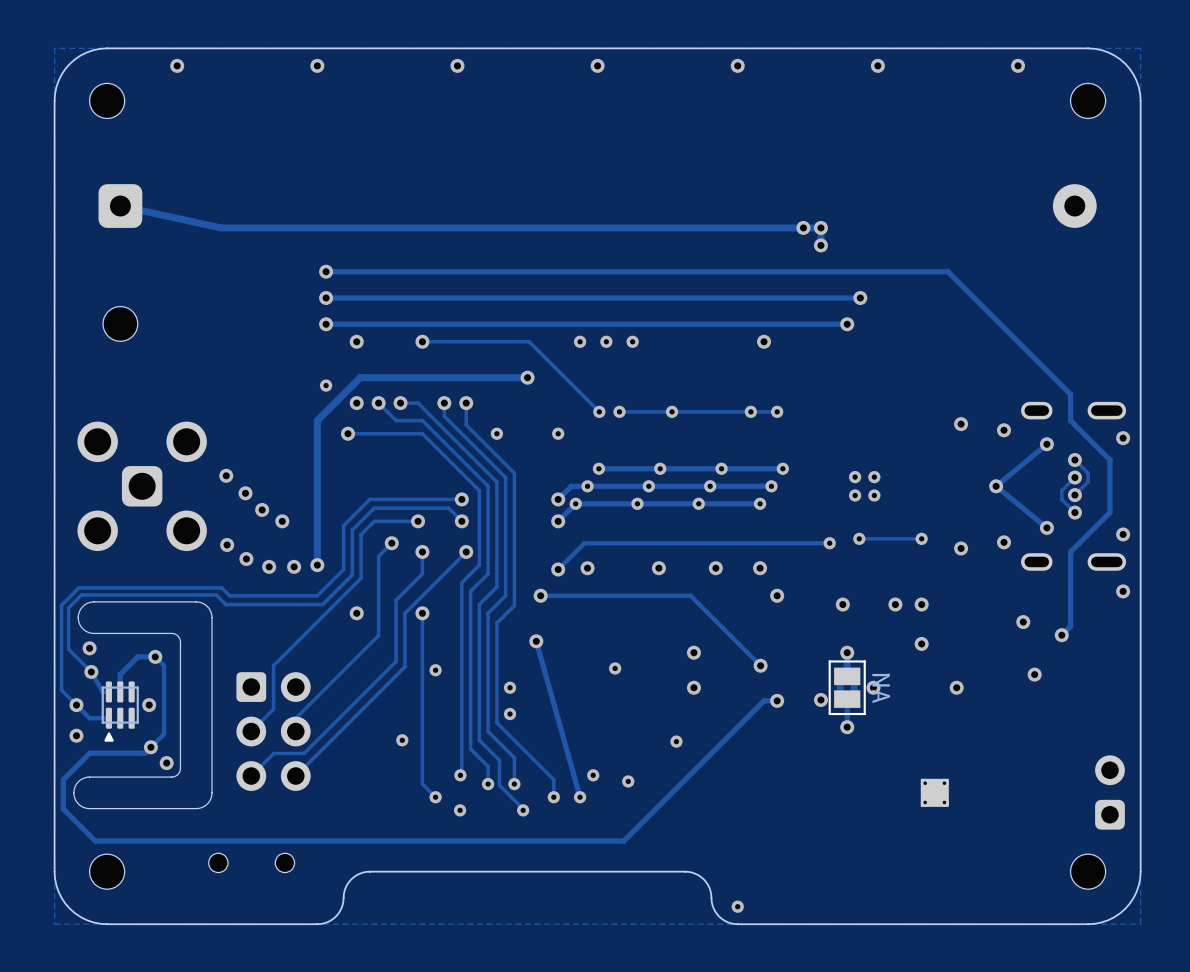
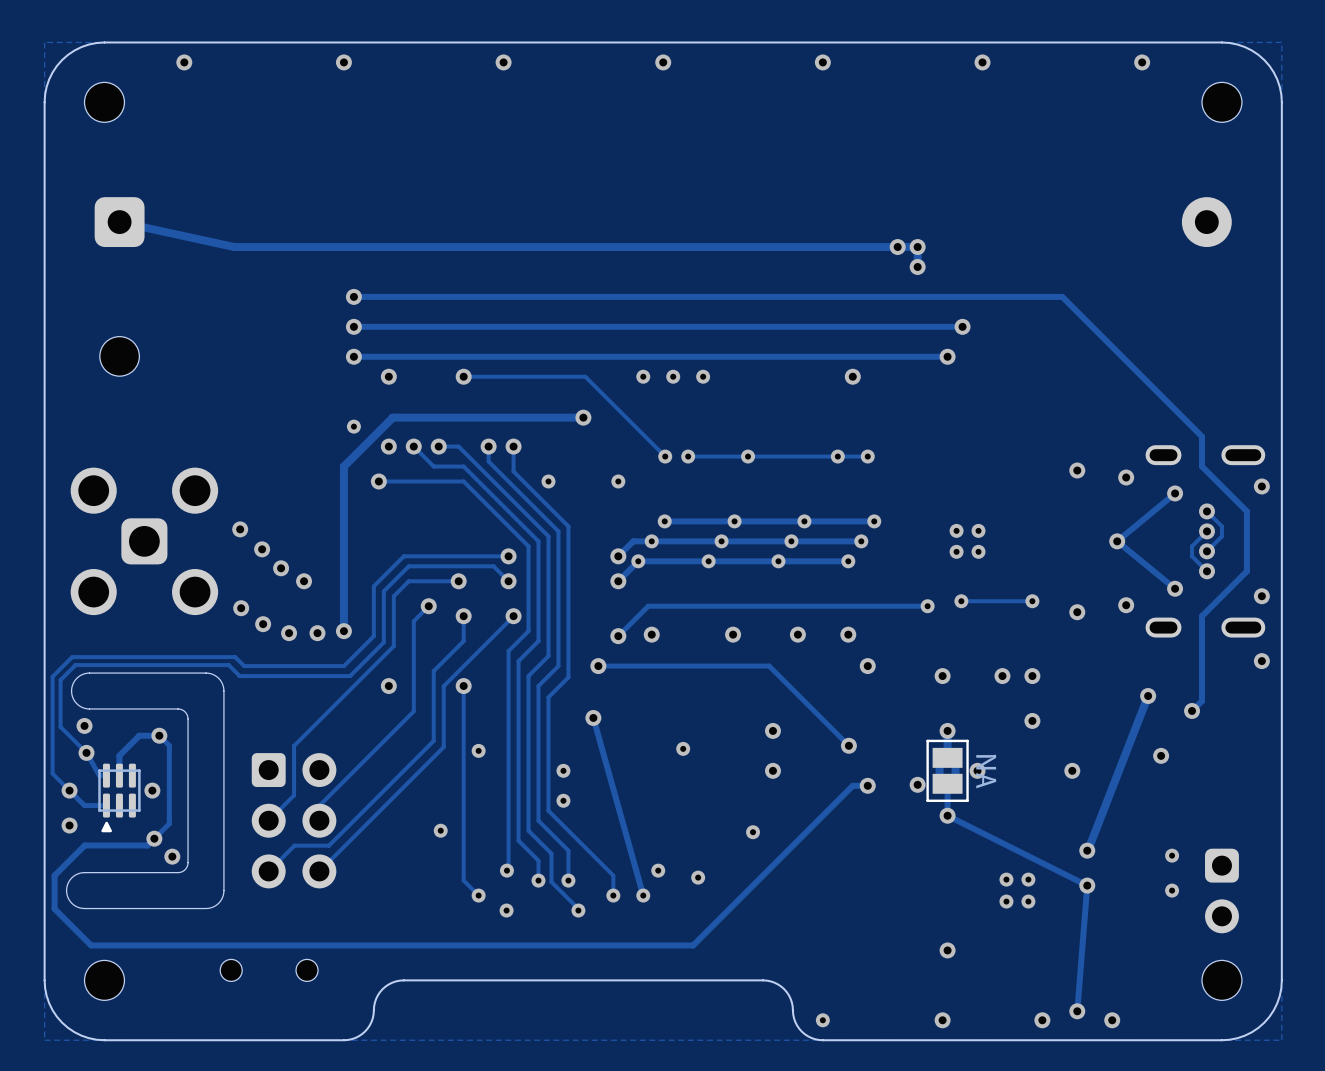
track: none -> (1148, 696) (1087, 850)
track: none -> (947, 815) (1087, 885) (1077, 1011)
via: none -> (1087, 850)
via: none -> (1172, 855)
via: none -> (1006, 879)
via: none -> (1028, 879)
via: none -> (1087, 885)
part: (934, 792) -> none
via: none -> (1172, 890)
part rotation: 0° (1109, 792) -> 180° (1221, 890)
via: none -> (1006, 901)
via: none -> (1028, 901)
via: none -> (947, 950)
via: none -> (1077, 1011)
via: none -> (942, 1020)
via: none -> (1042, 1020)
via: none -> (1112, 1020)

